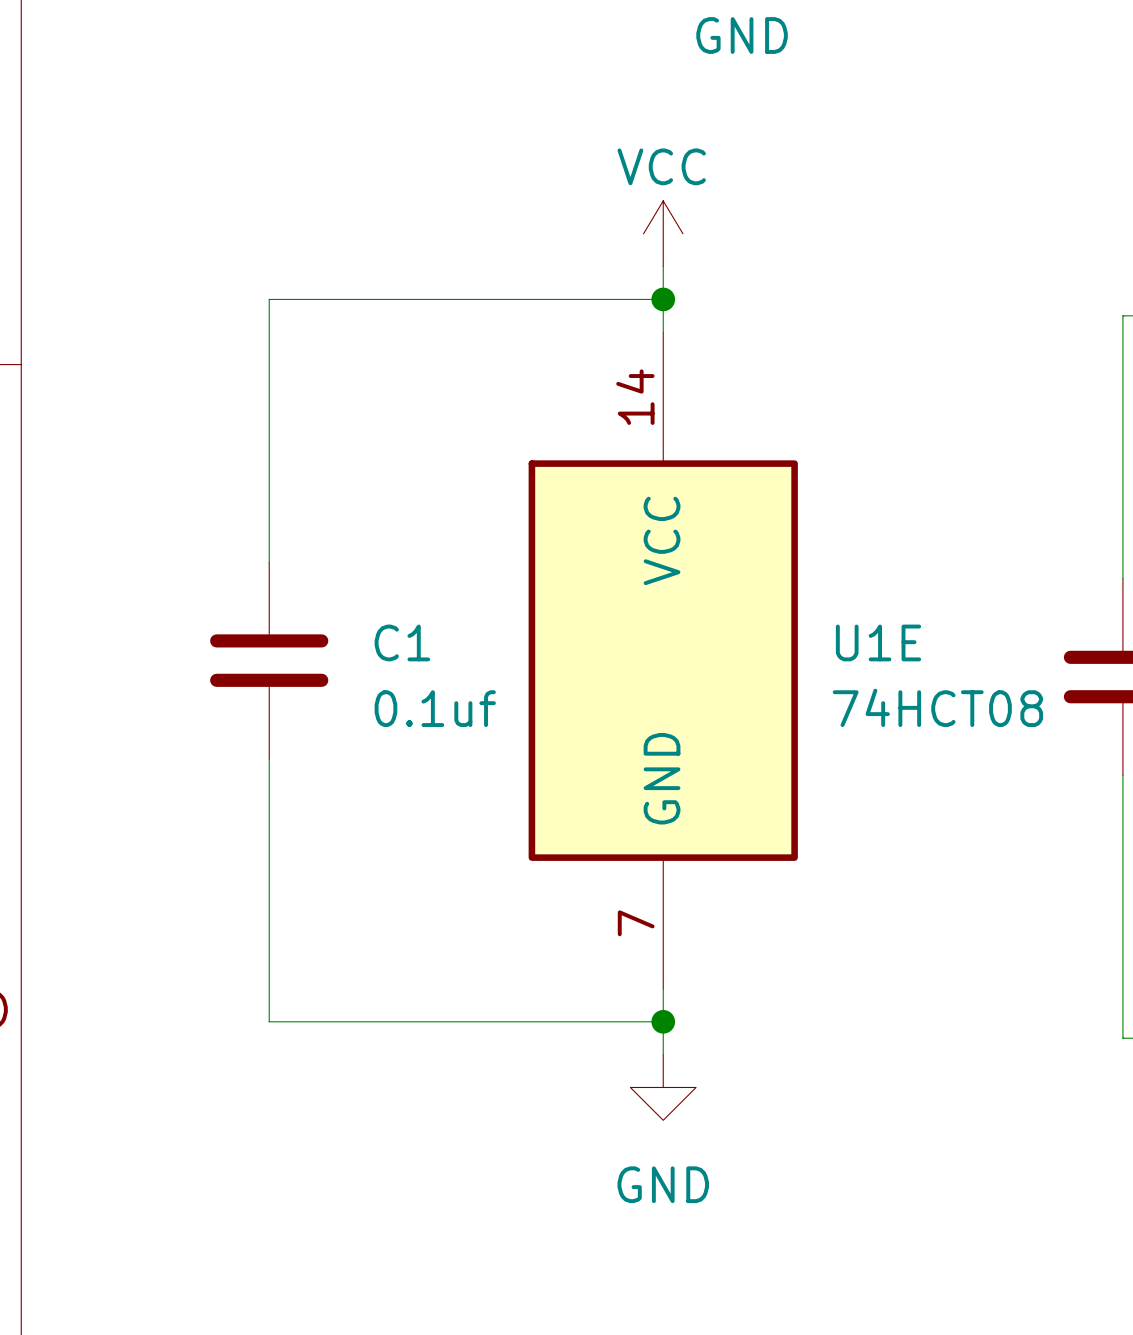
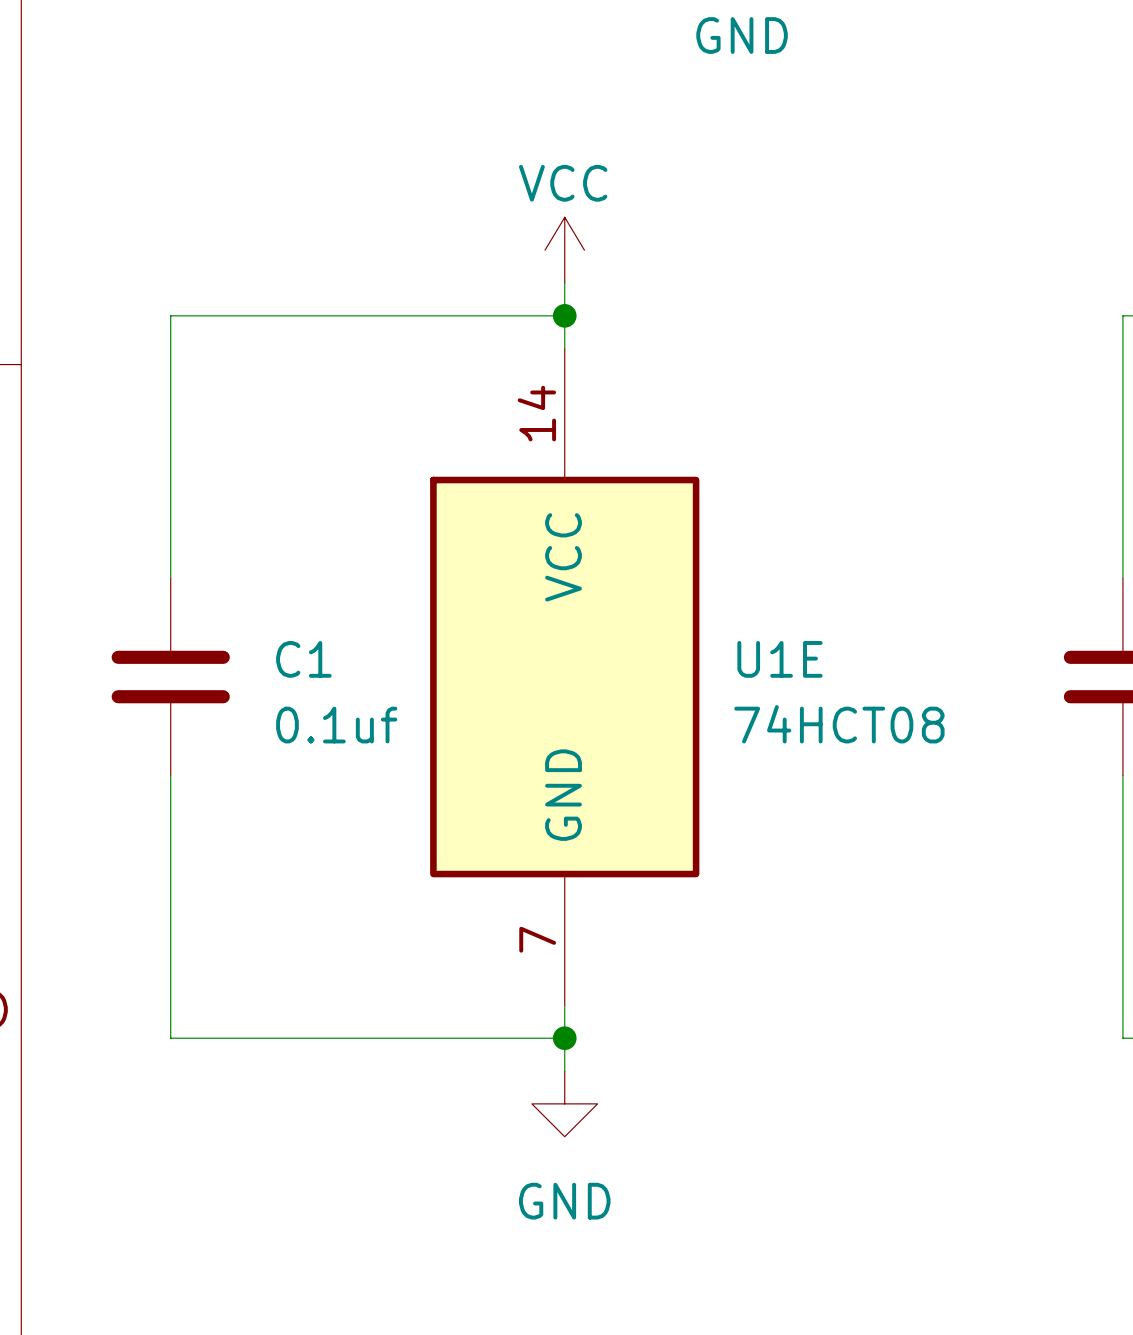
power symbol position: VCC (663, 233) -> VCC (564, 250)
wire: (663, 266) (663, 332) -> (564, 283) (564, 348)
wire: (663, 299) (269, 299) (269, 562) -> (564, 315) (170, 315) (170, 578)
junction position: (663, 299) -> (564, 315)
C1 position: (269, 660) -> (170, 677)
U1E position: (663, 660) -> (564, 677)
wire: (269, 759) (269, 1021) (663, 1021) -> (170, 775) (170, 1038) (564, 1038)
wire: (663, 988) (663, 1054) -> (564, 1005) (564, 1071)
junction position: (663, 1021) -> (564, 1038)
power symbol position: GND (663, 1087) -> GND (564, 1103)

